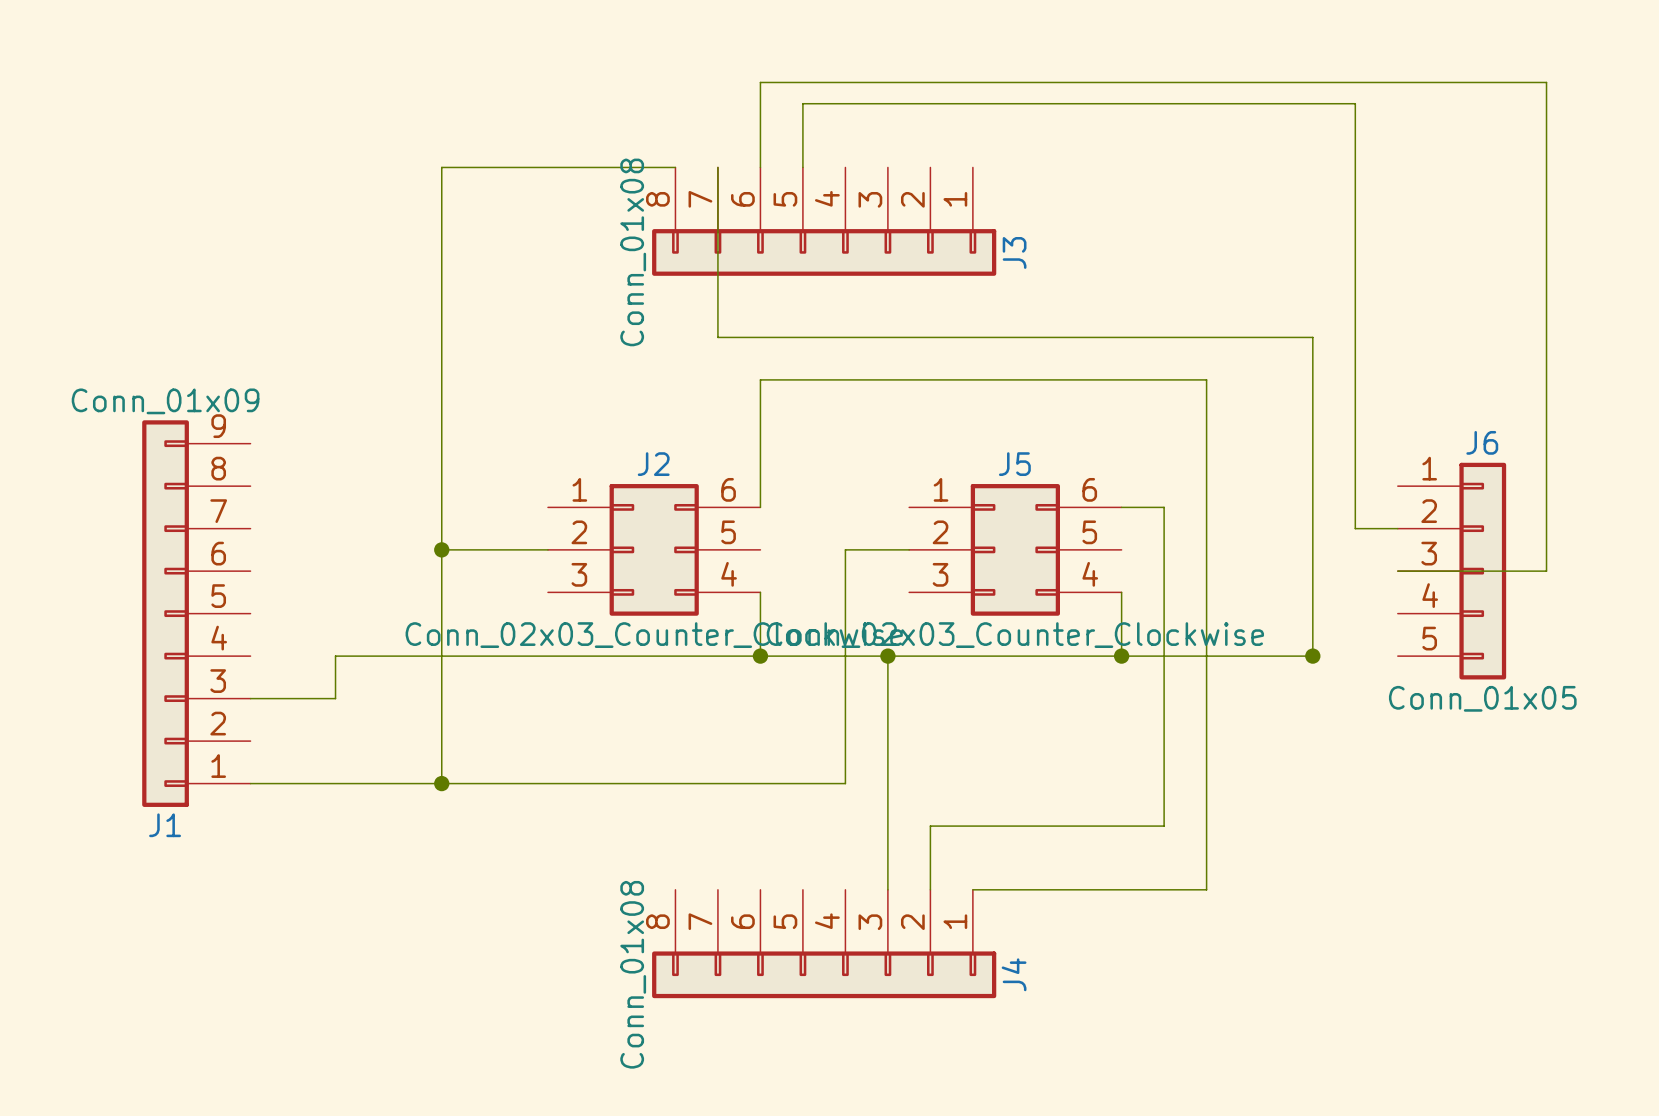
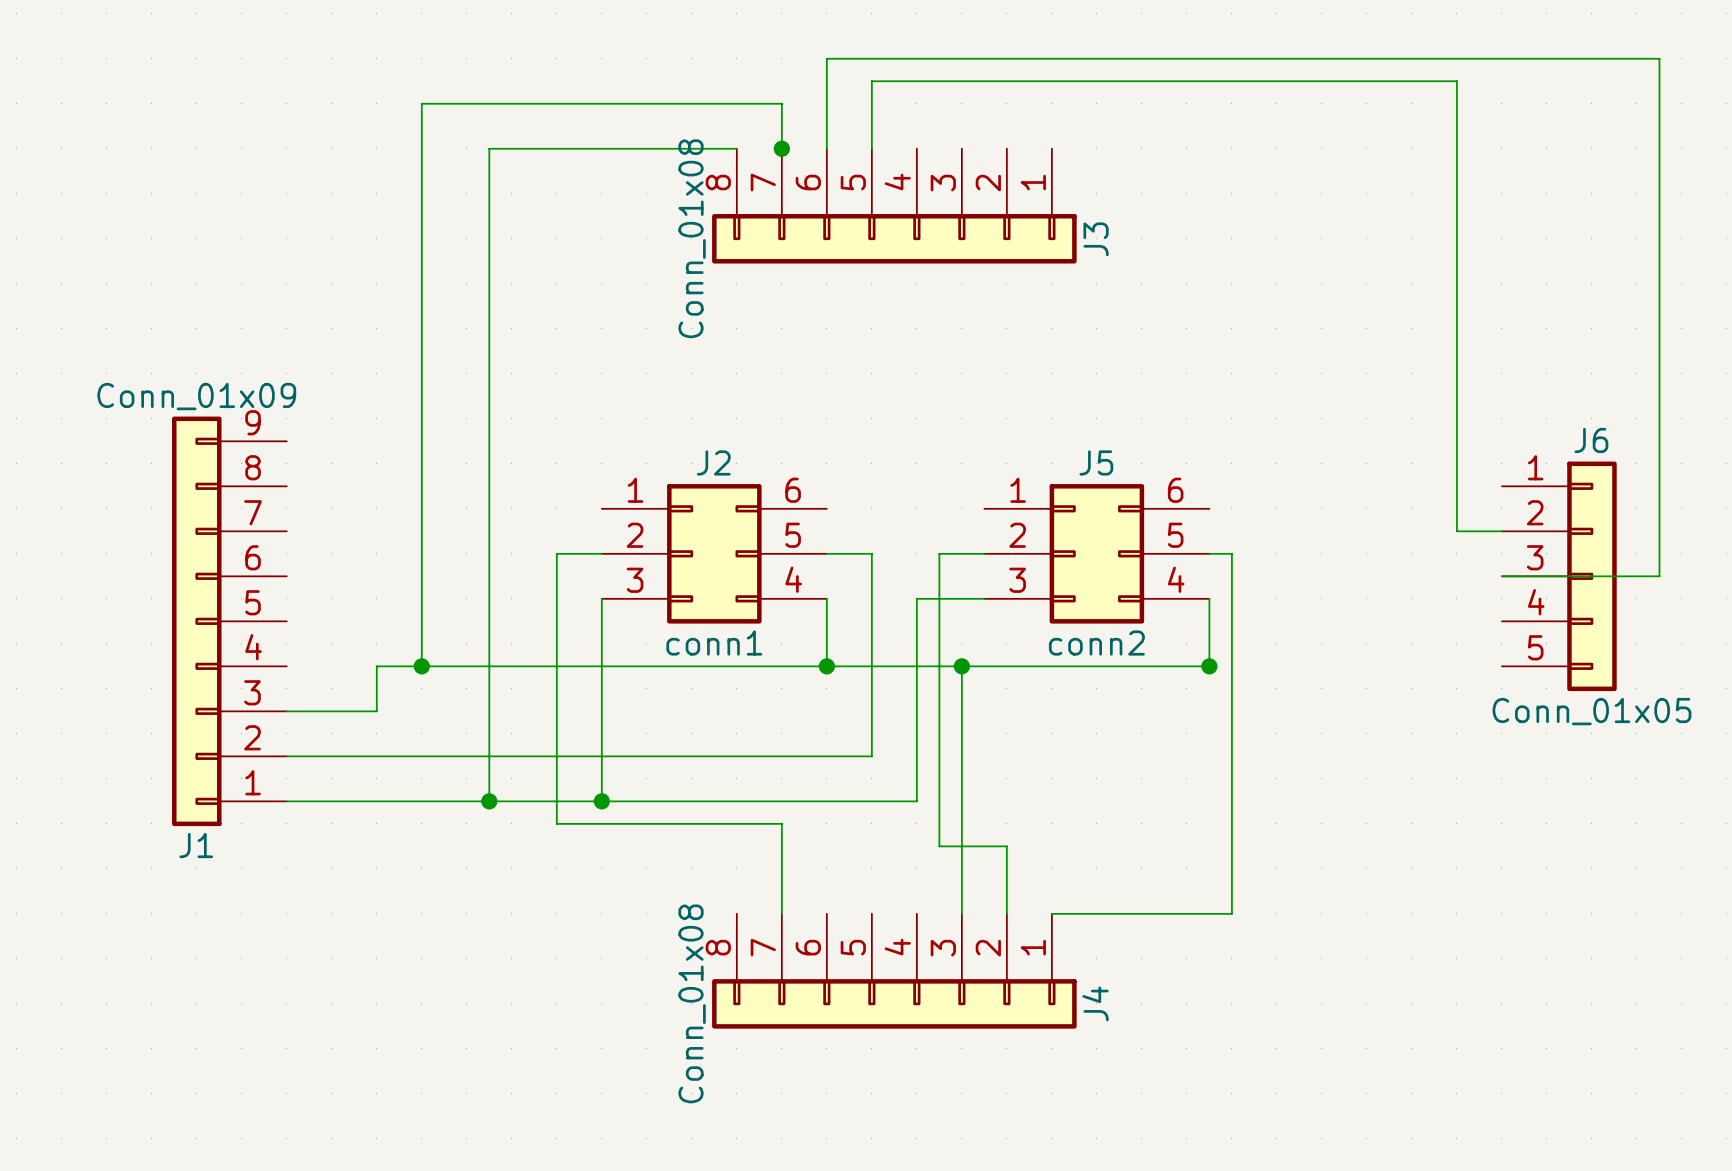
wire: (717, 167) (717, 337) (1312, 337) (1312, 656) (1121, 656) -> (781, 148) (781, 103) (421, 103) (421, 666)
junction: none -> (781, 148)
wire: (760, 507) (760, 379) (1206, 379) (1206, 889) (1142, 889) -> (1209, 553) (1231, 553) (1231, 913)
wire: (1121, 507) (1164, 507) (1164, 826) (930, 826) -> (939, 553) (939, 846) (1006, 846)
wire: (441, 549) (505, 549) -> (781, 913) (781, 823) (556, 823) (556, 553)
junction: (441, 549) -> none
wire: none -> (826, 553) (871, 553) (871, 756) (286, 756)
wire: (866, 549) (845, 549) (845, 592) -> (984, 598) (916, 598)
wire: none -> (601, 598) (601, 801)
J2 value: Conn_02x03_Counter_Clockwise (654, 635) -> conn1 (714, 643)
J5 value: Conn_02x03_Counter_Clockwise (1015, 635) -> conn2 (1096, 643)
junction: none -> (421, 666)
junction: (1312, 656) -> none
junction: none -> (601, 801)

